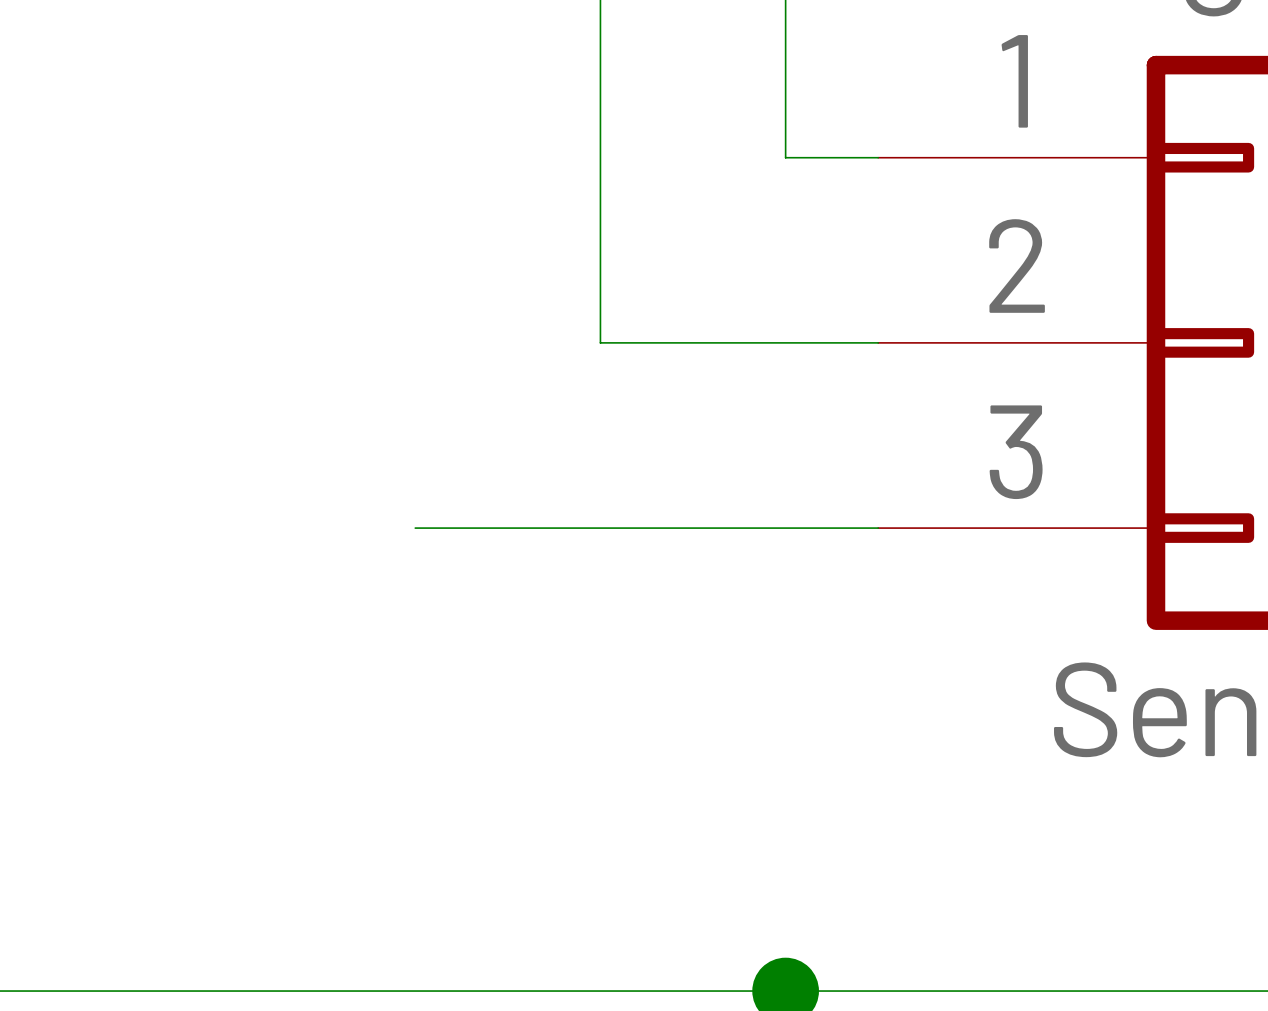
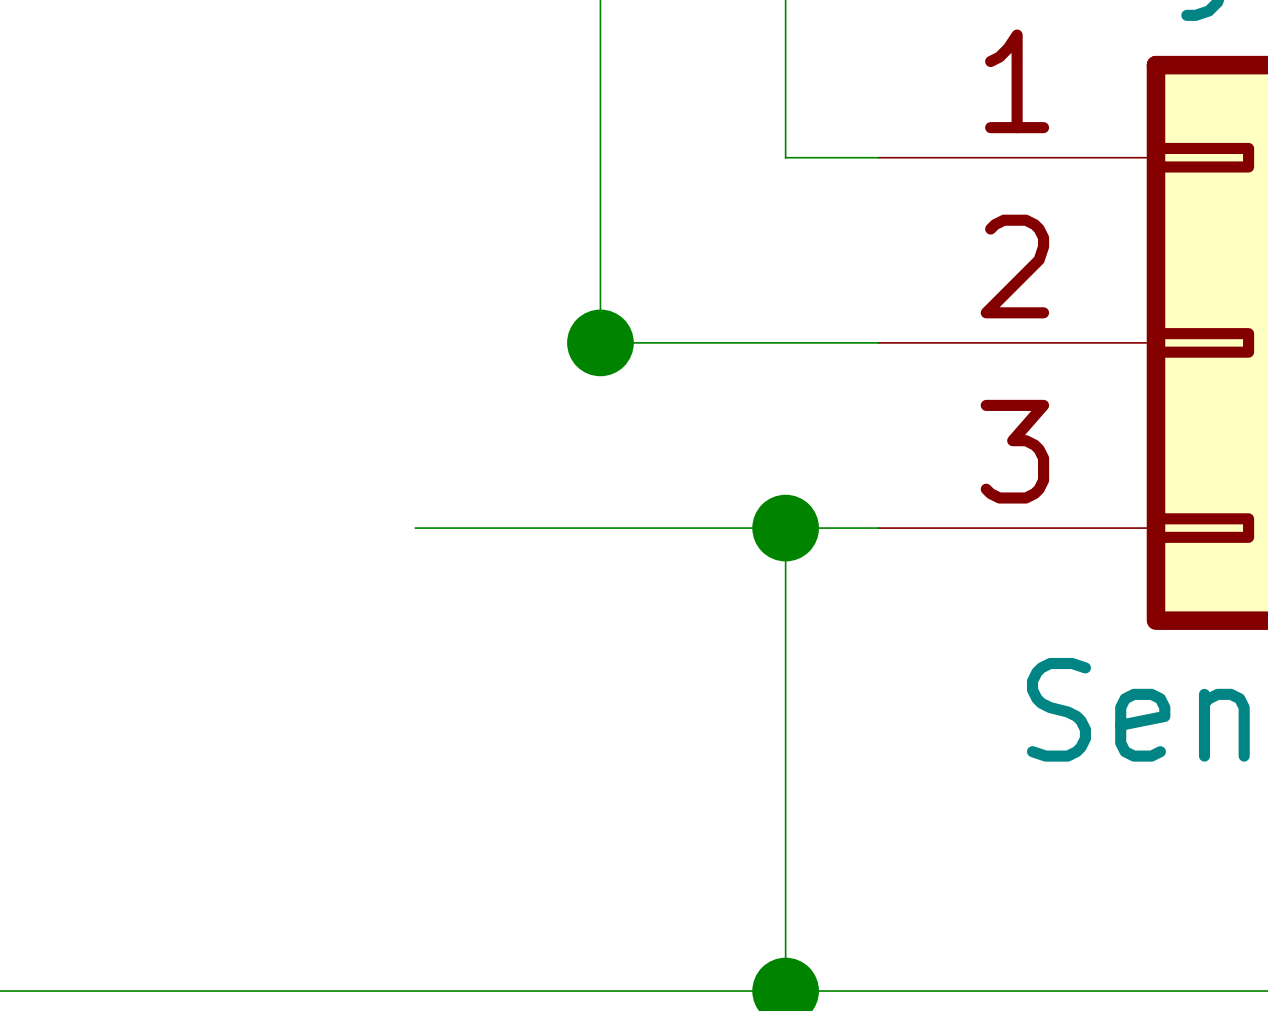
junction: none -> (600, 342)
wire: none -> (785, 528) (785, 991)
junction: none -> (785, 528)

